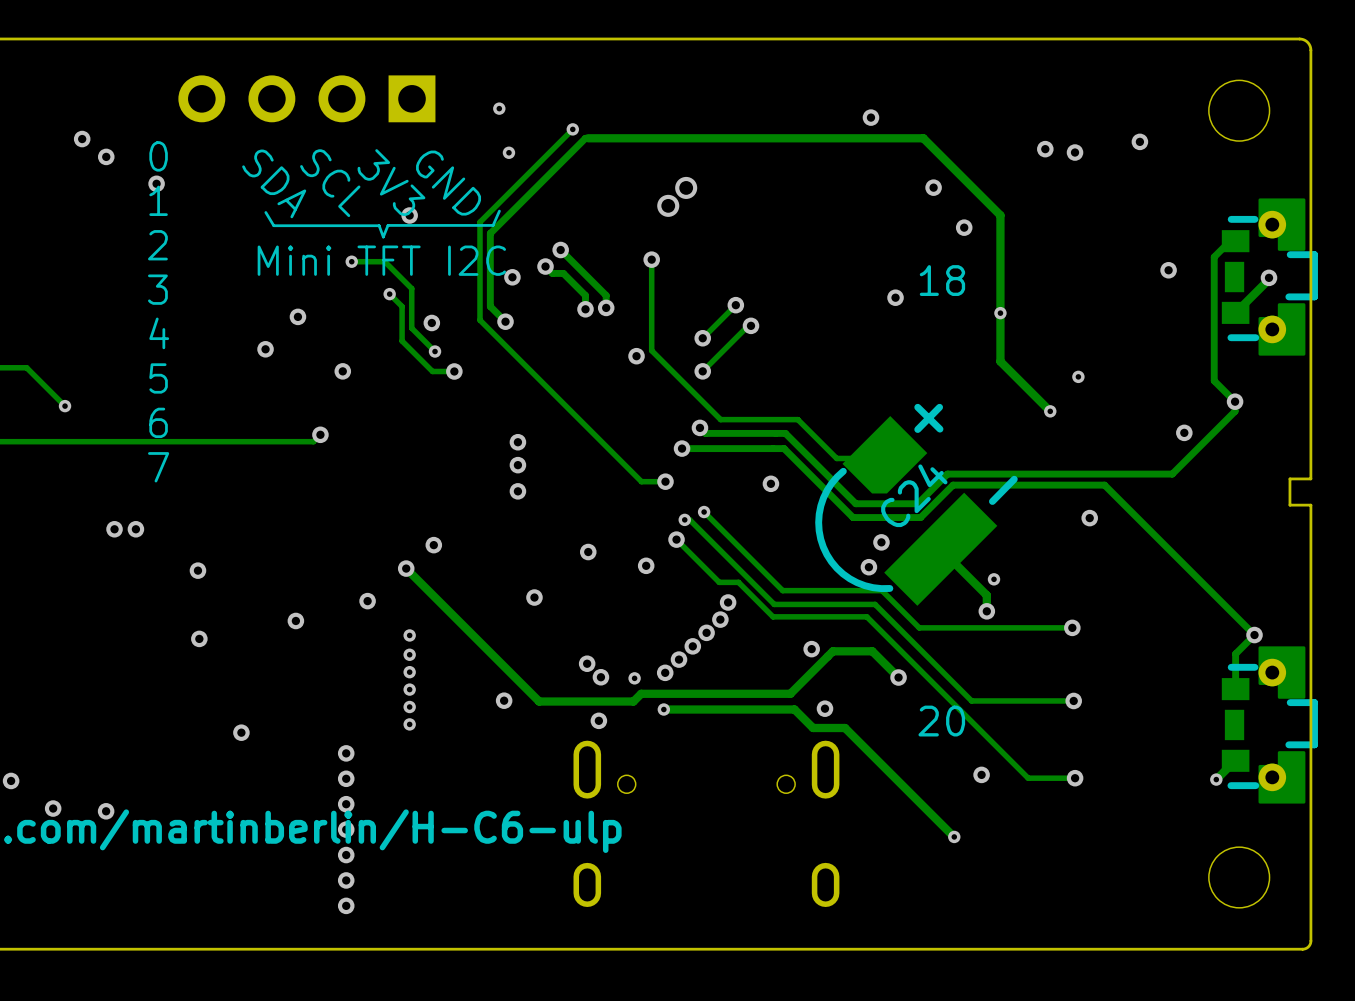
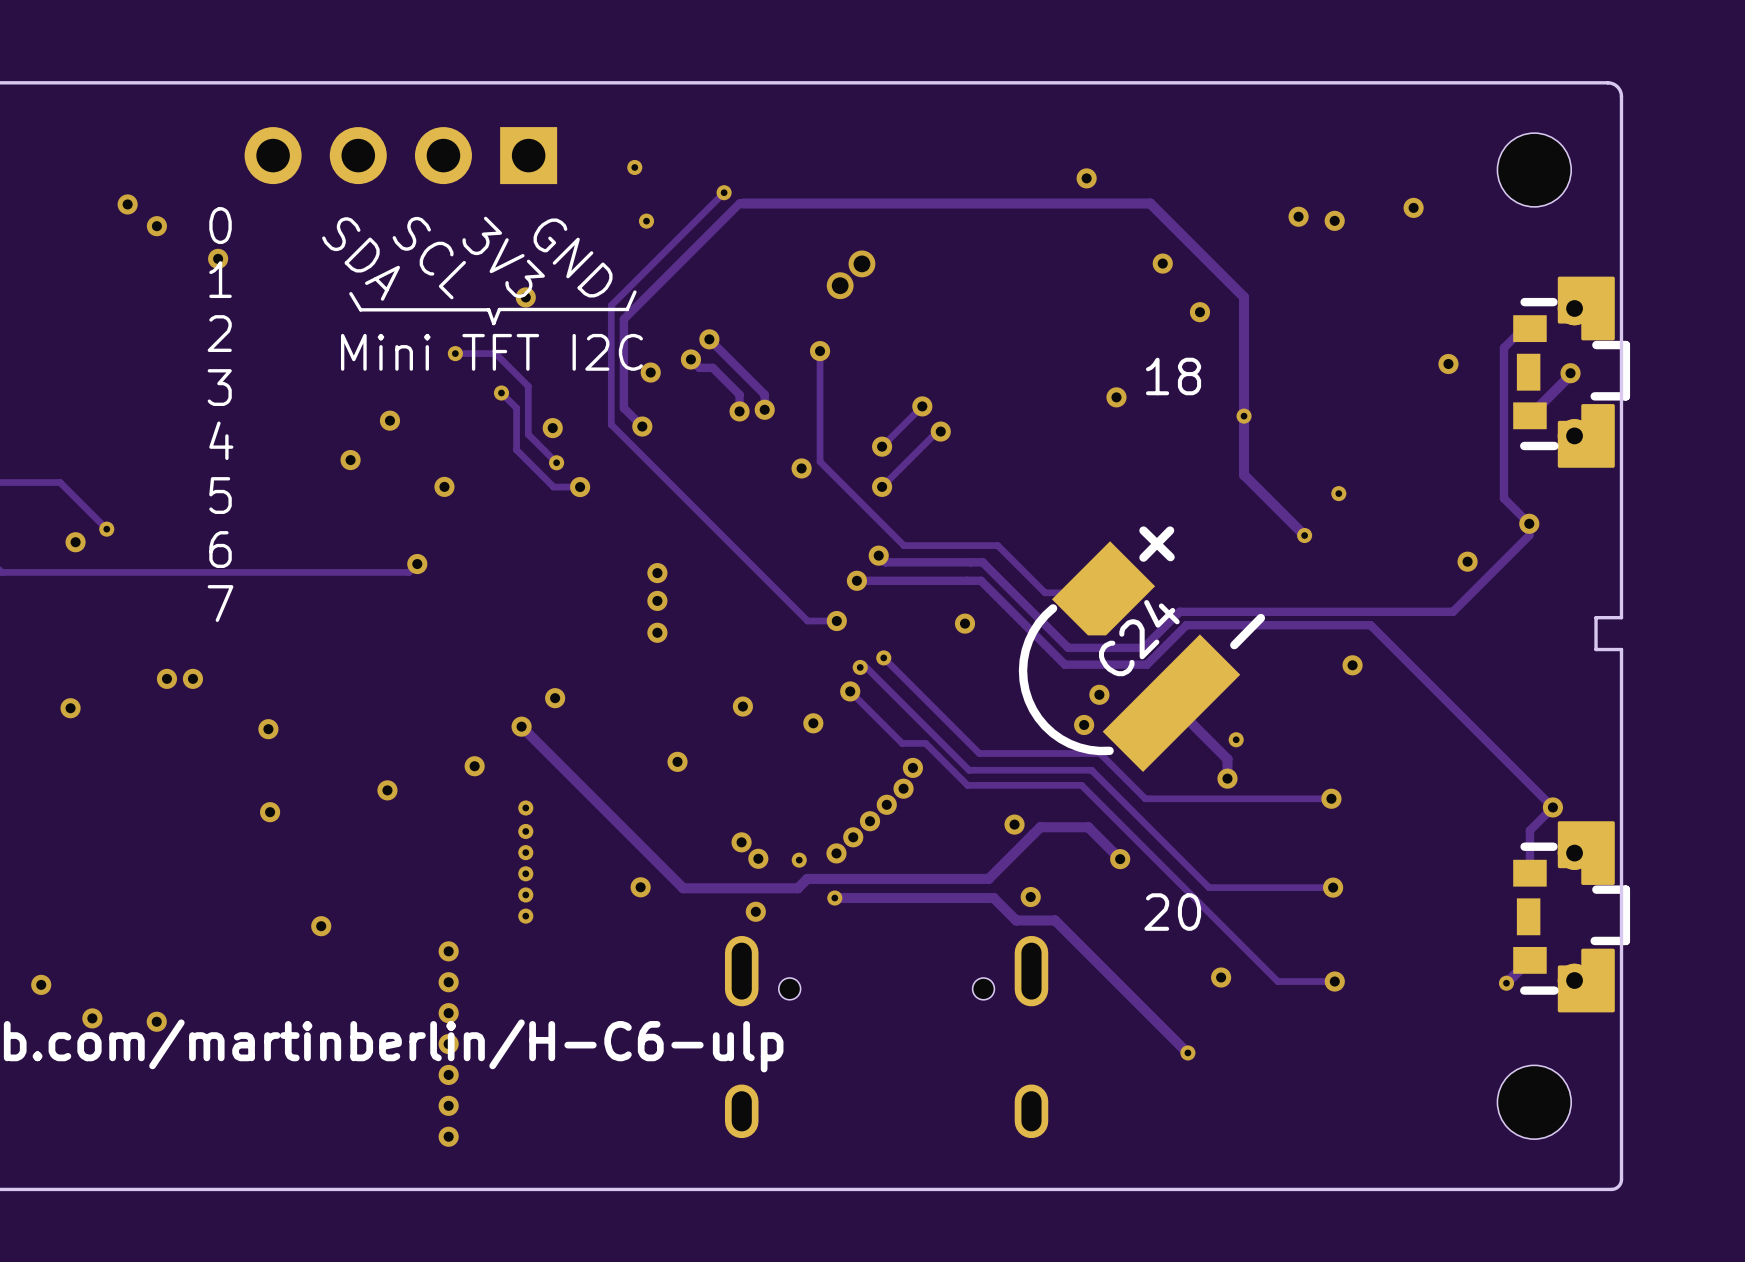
via: none -> (75, 542)
via: none -> (70, 708)

